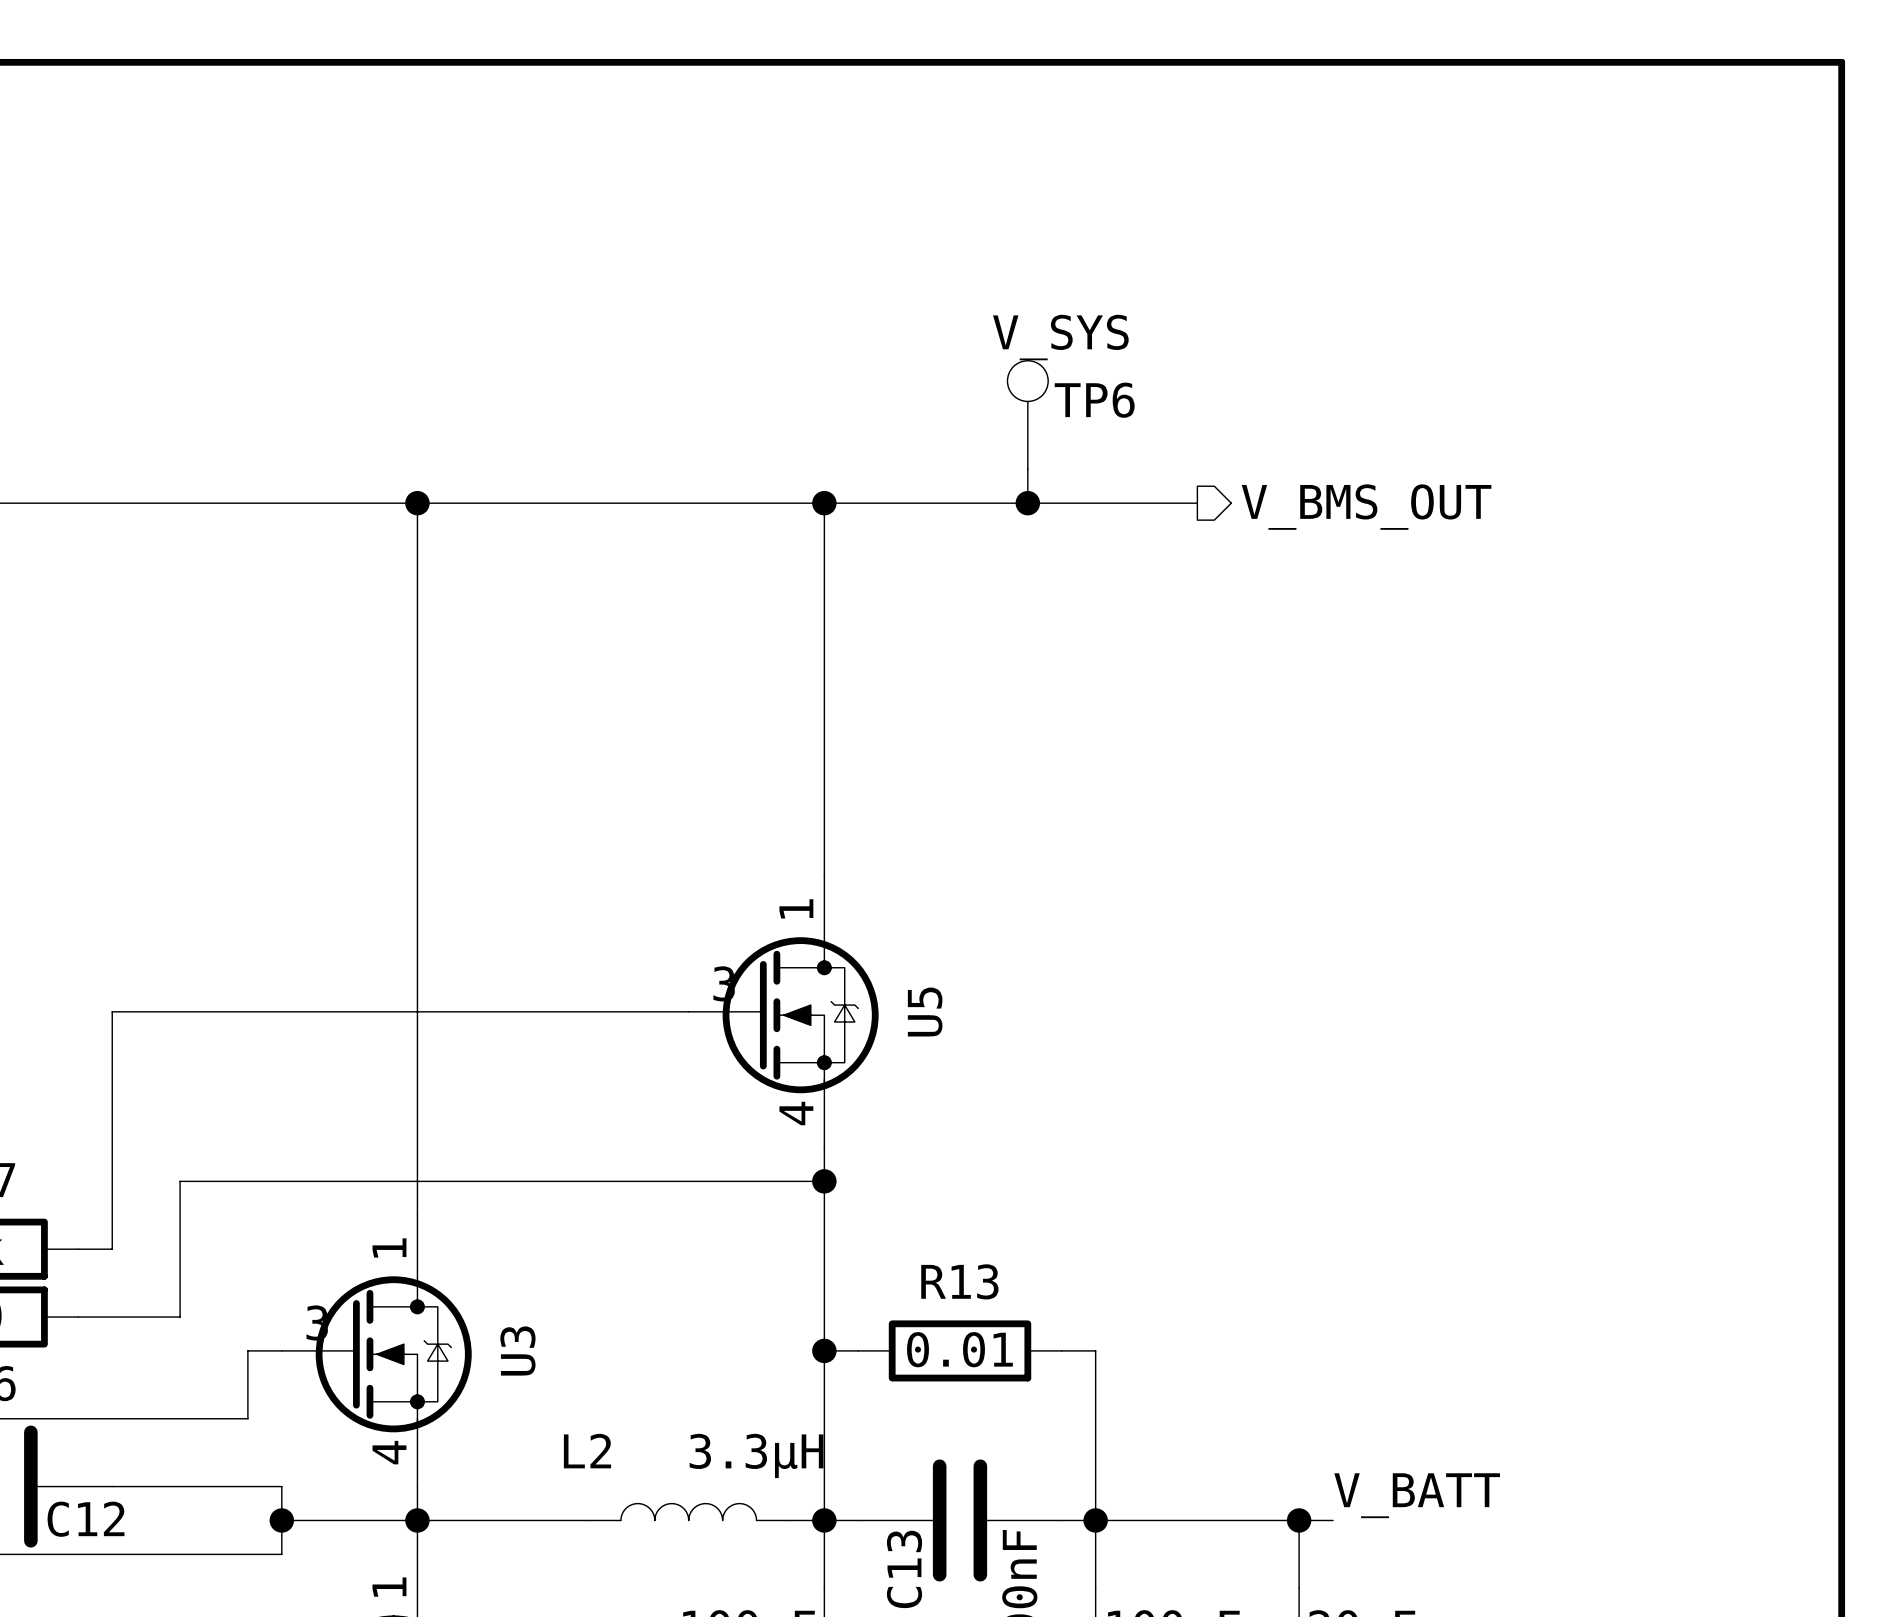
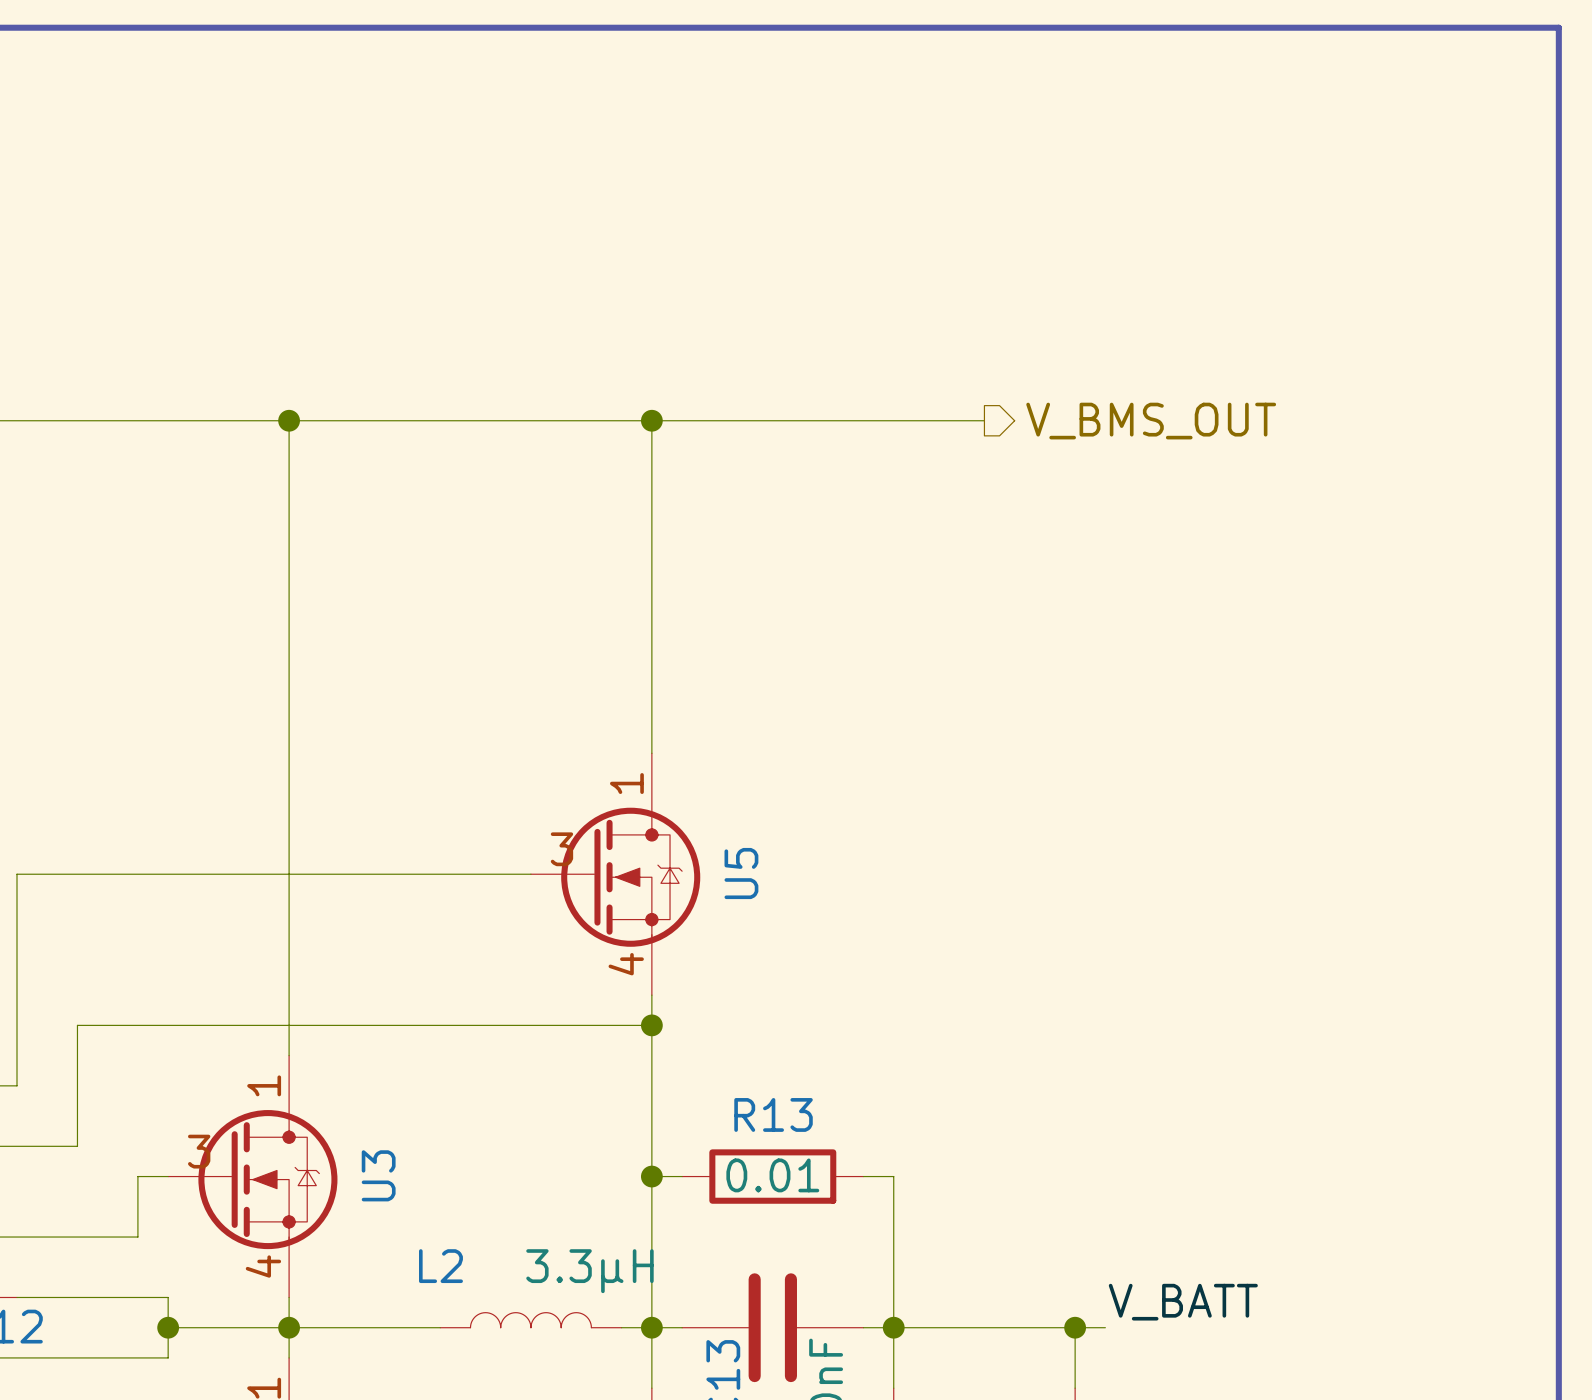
TP6: V_SYS (1027, 415) -> none
wire: (1027, 469) (1027, 503) -> none
junction: (1027, 503) -> none

